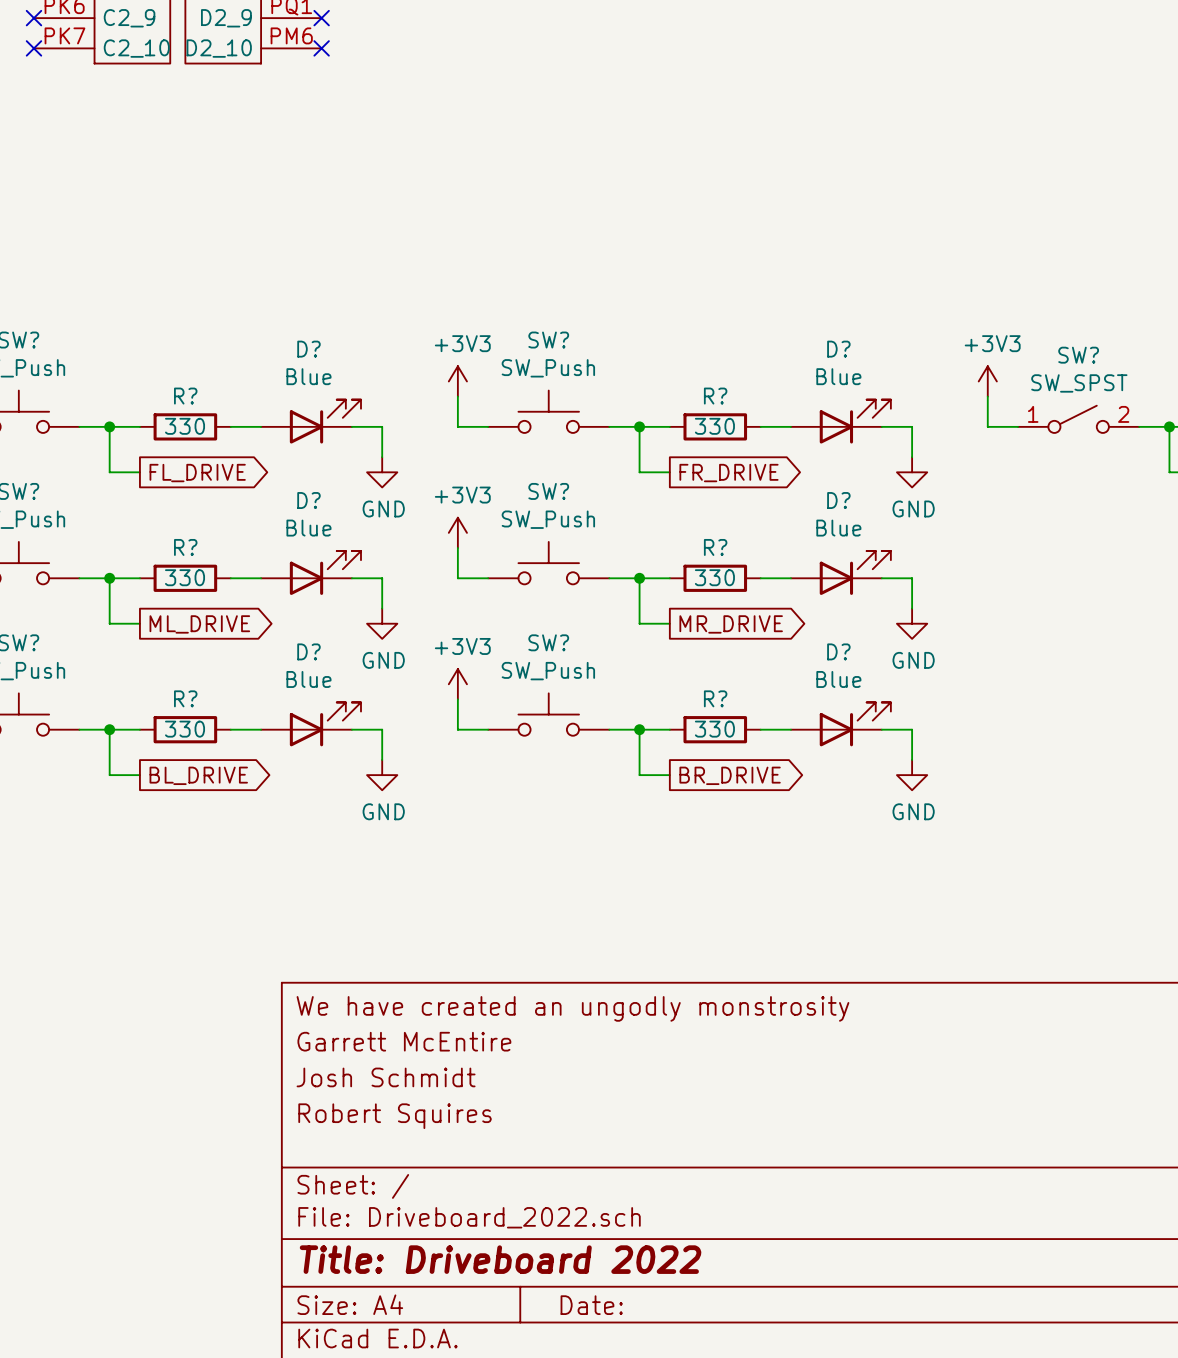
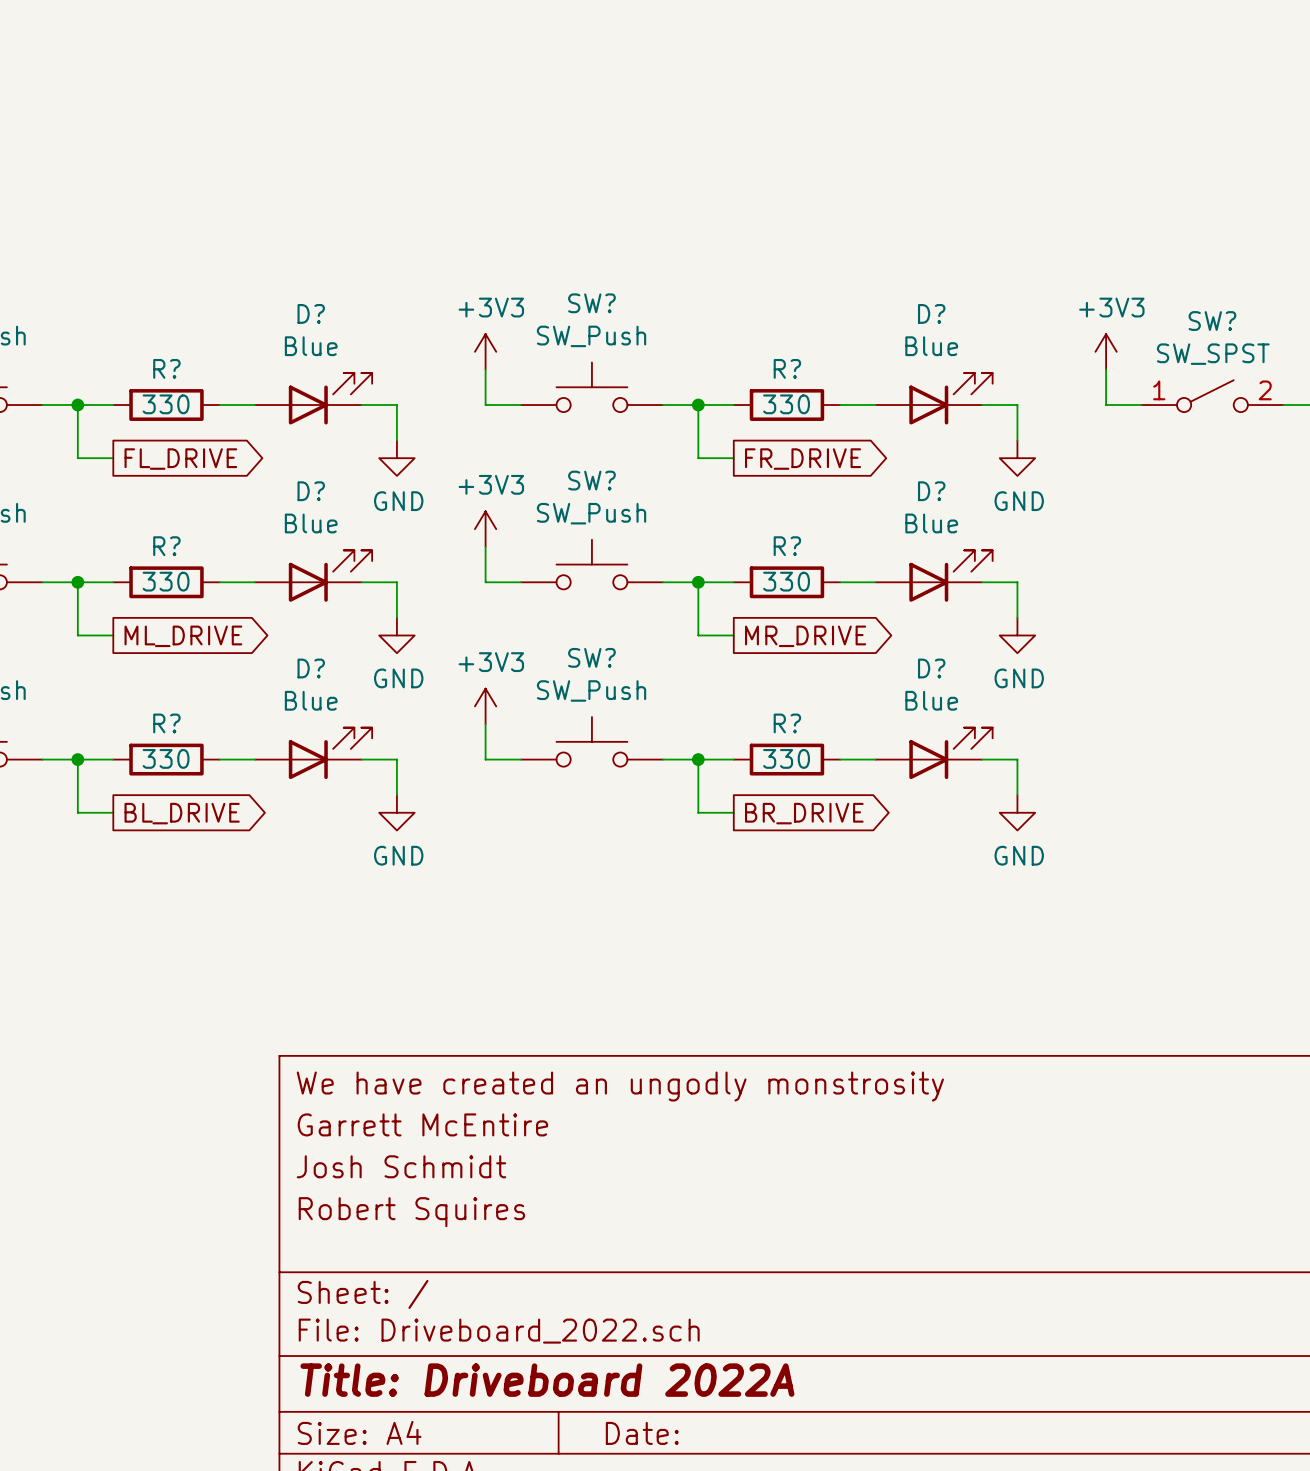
title block: Title: Driveboard 2022 (500, 1259) -> Title: Driveboard 2022A (547, 1380)

